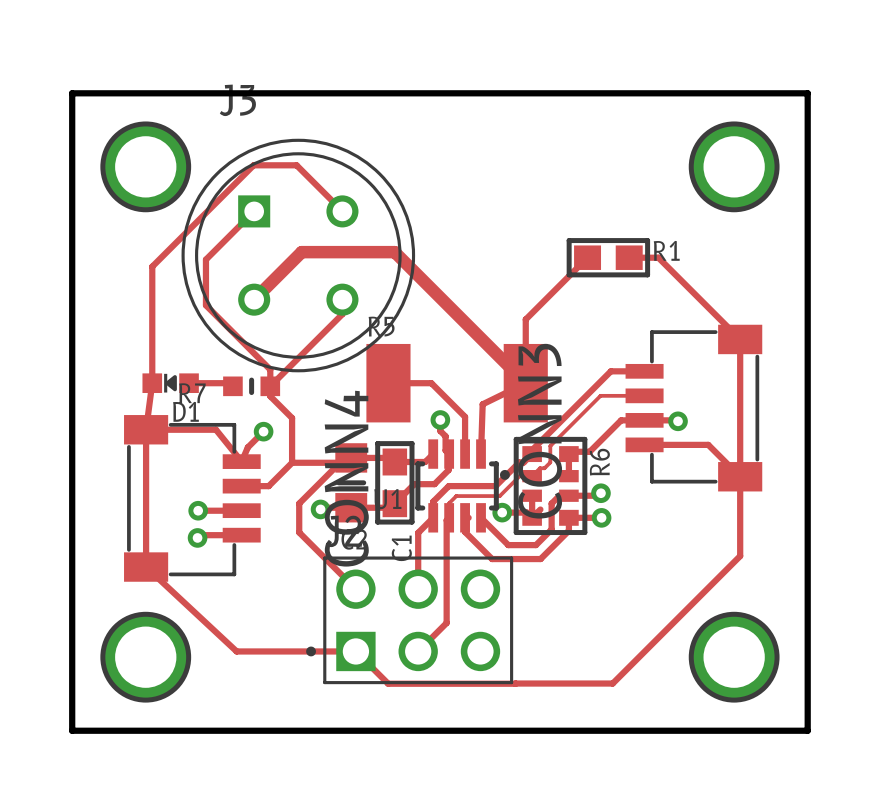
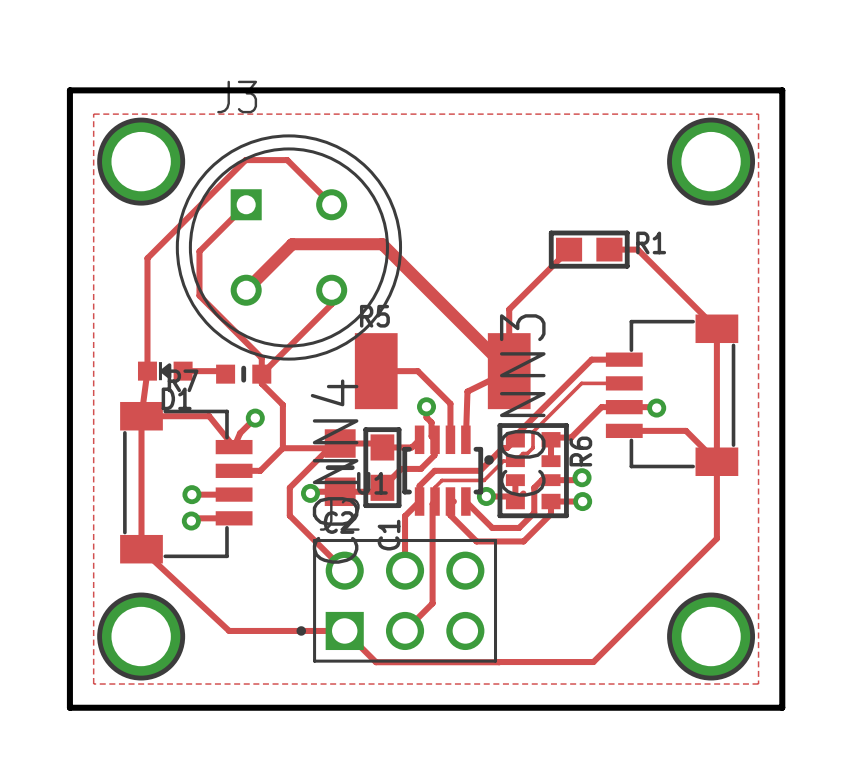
zone outline: none -> (93, 114) (758, 114) (758, 684) (93, 684) (93, 114)

